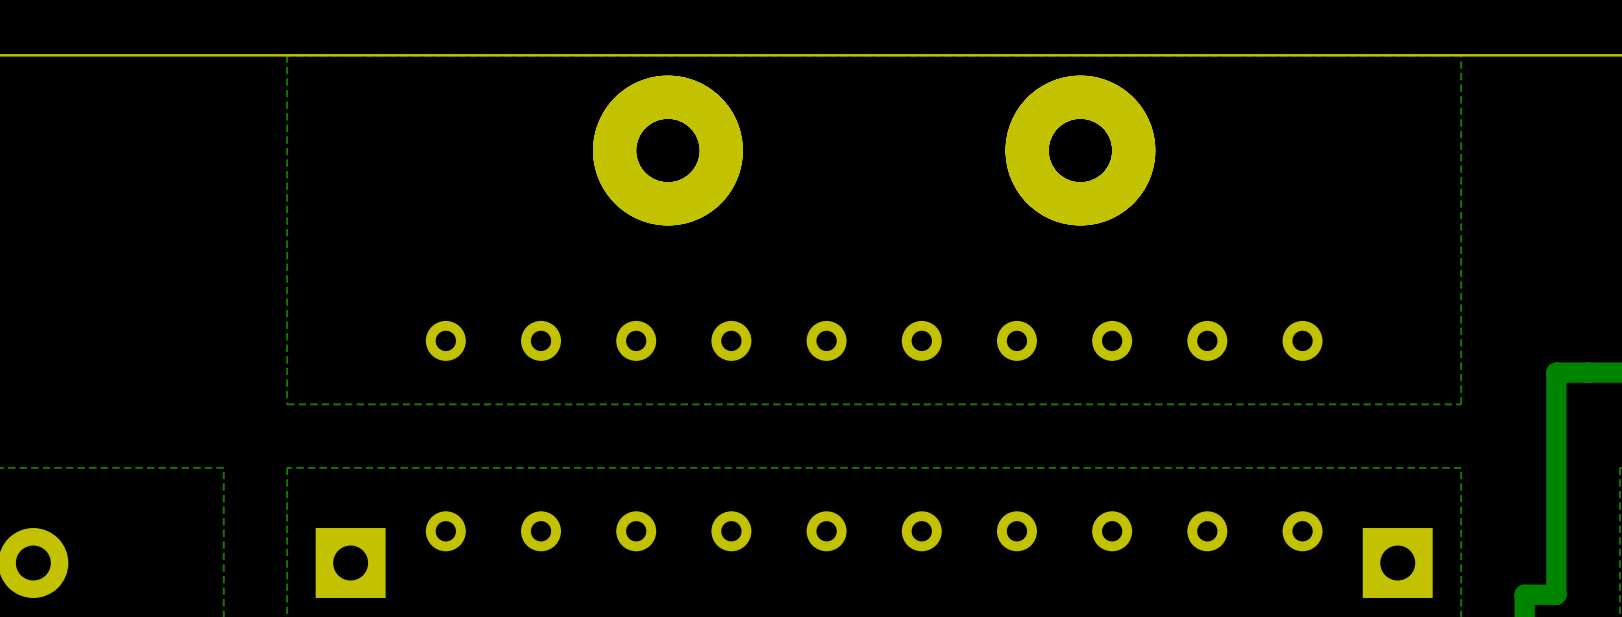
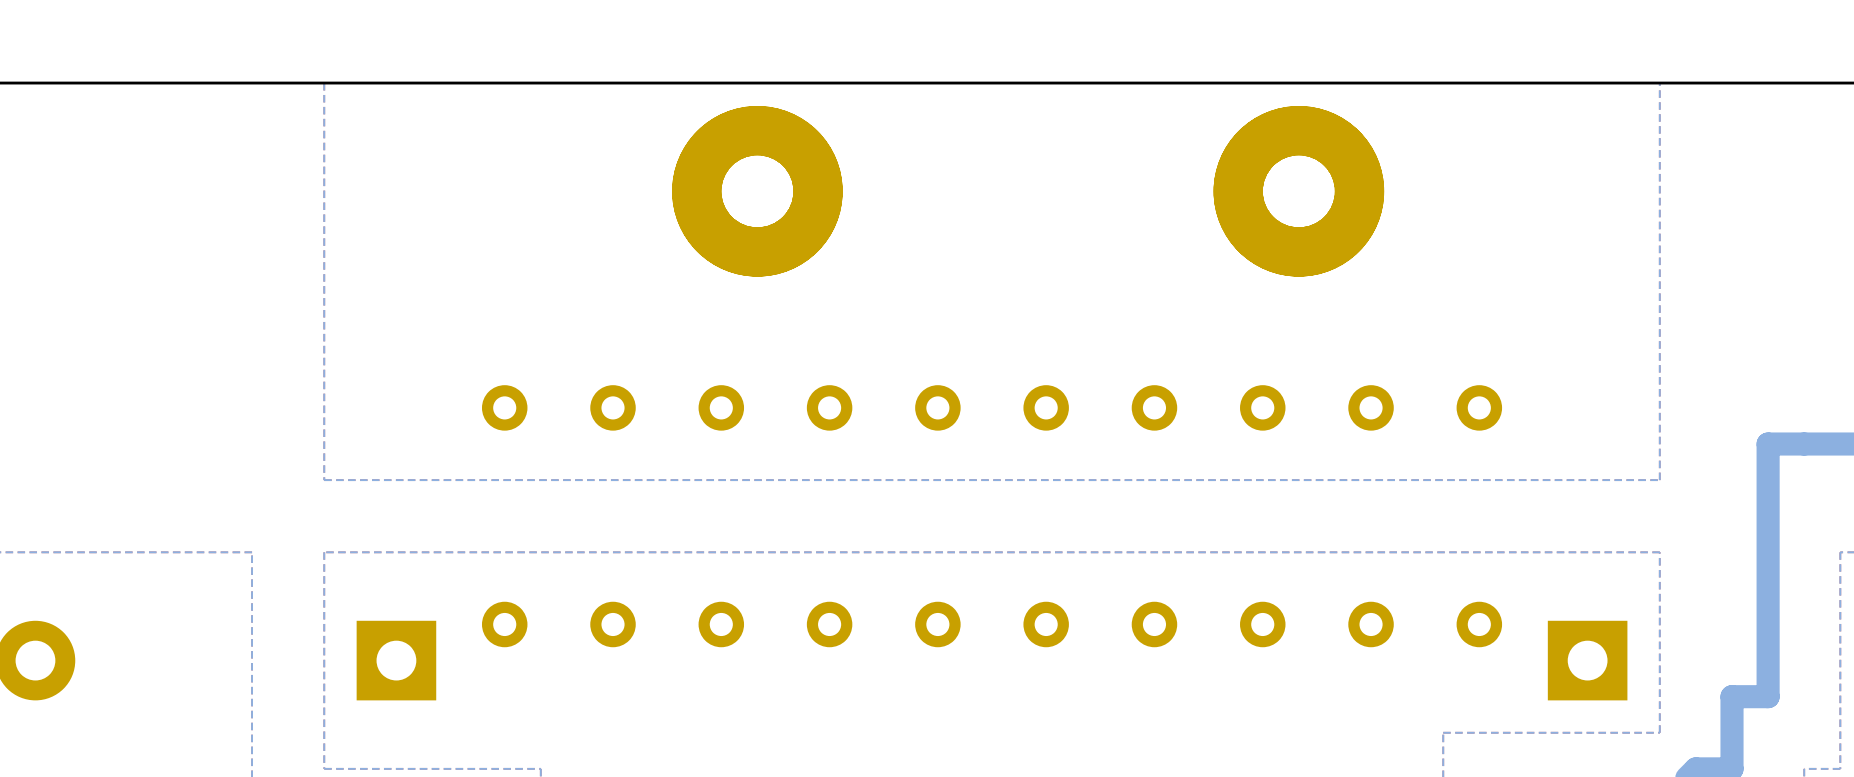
part position: (1080, 150) -> (1298, 191)

